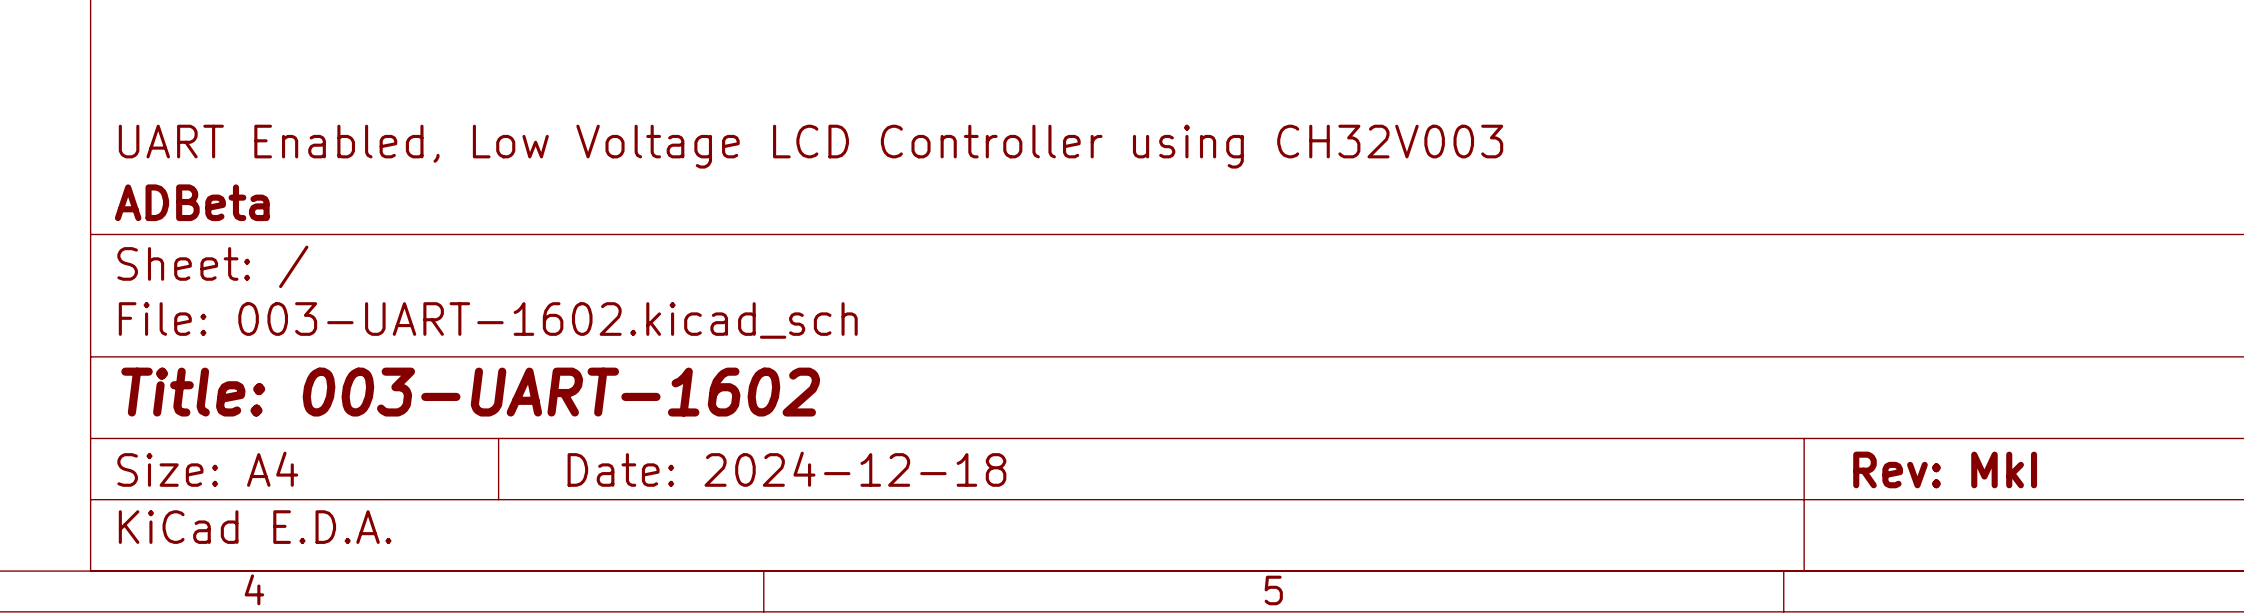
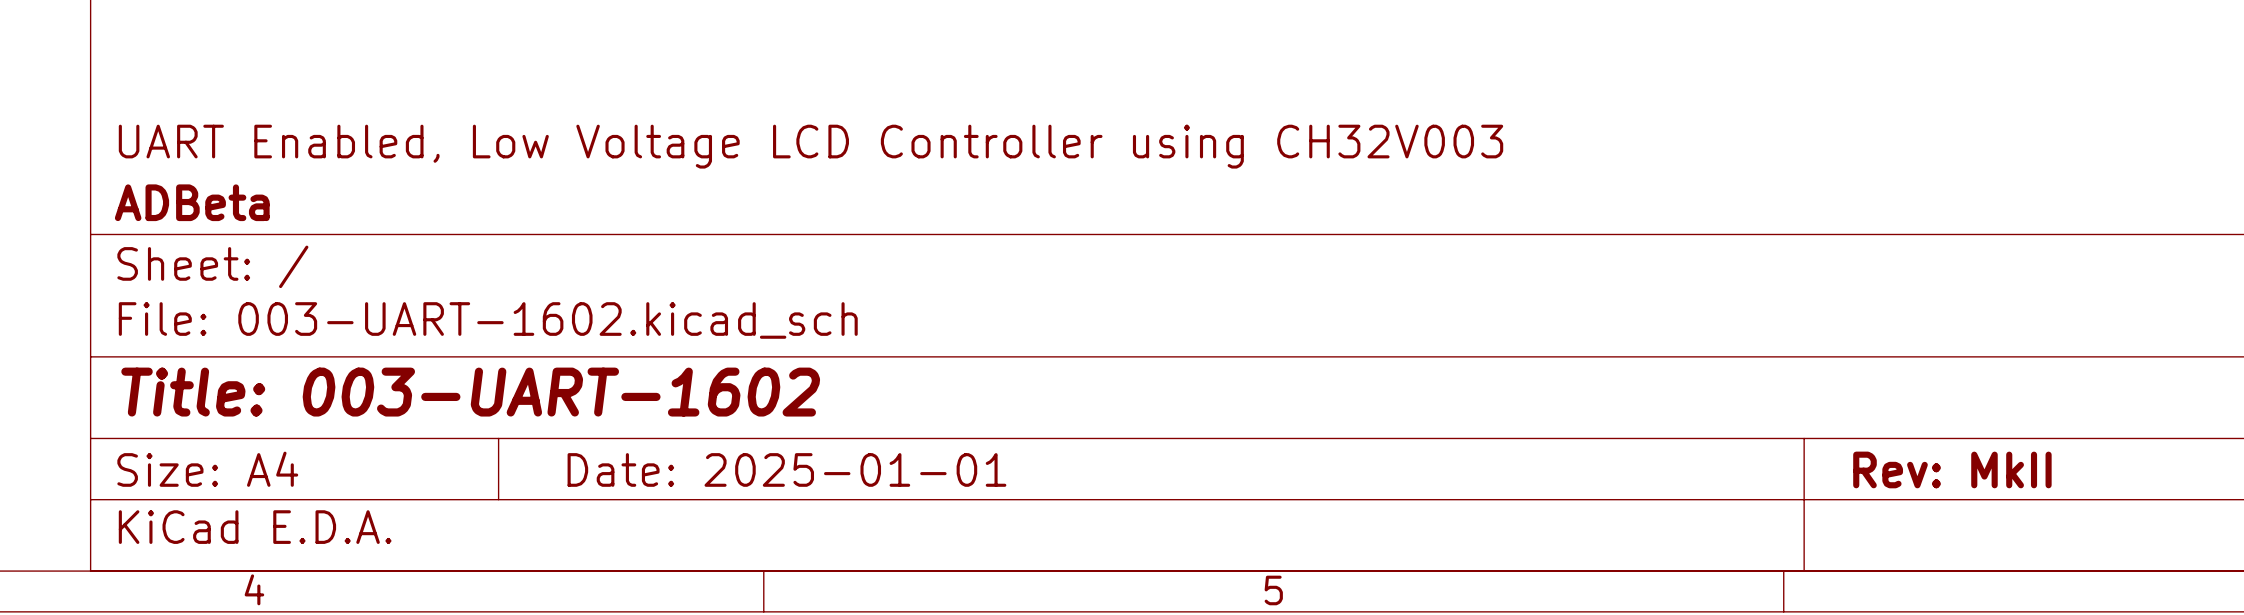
title block: Date: 2024-12-18 (786, 469) -> Date: 2025-01-01 (786, 469)
title block: Rev: MkI (1945, 469) -> Rev: MkII (1952, 469)

